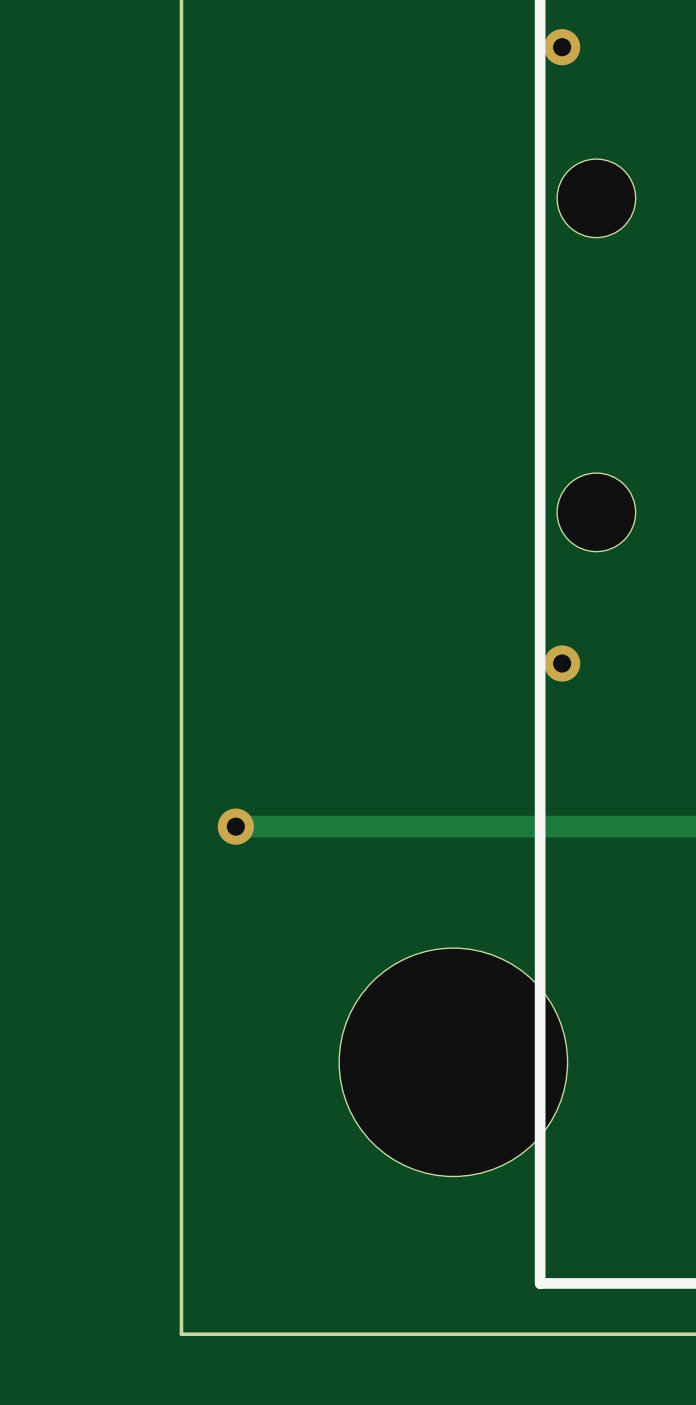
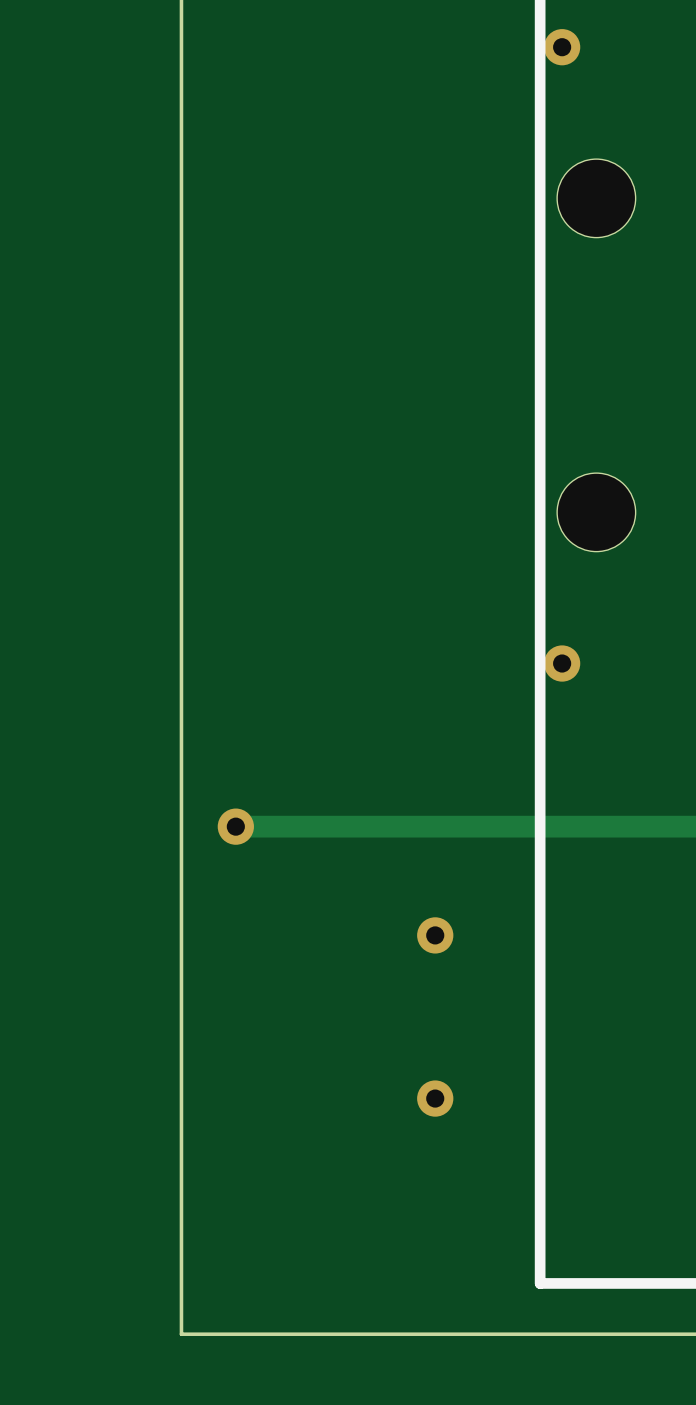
via: none -> (435, 935)
part: (453, 1062) -> none
via: none -> (435, 1098)

